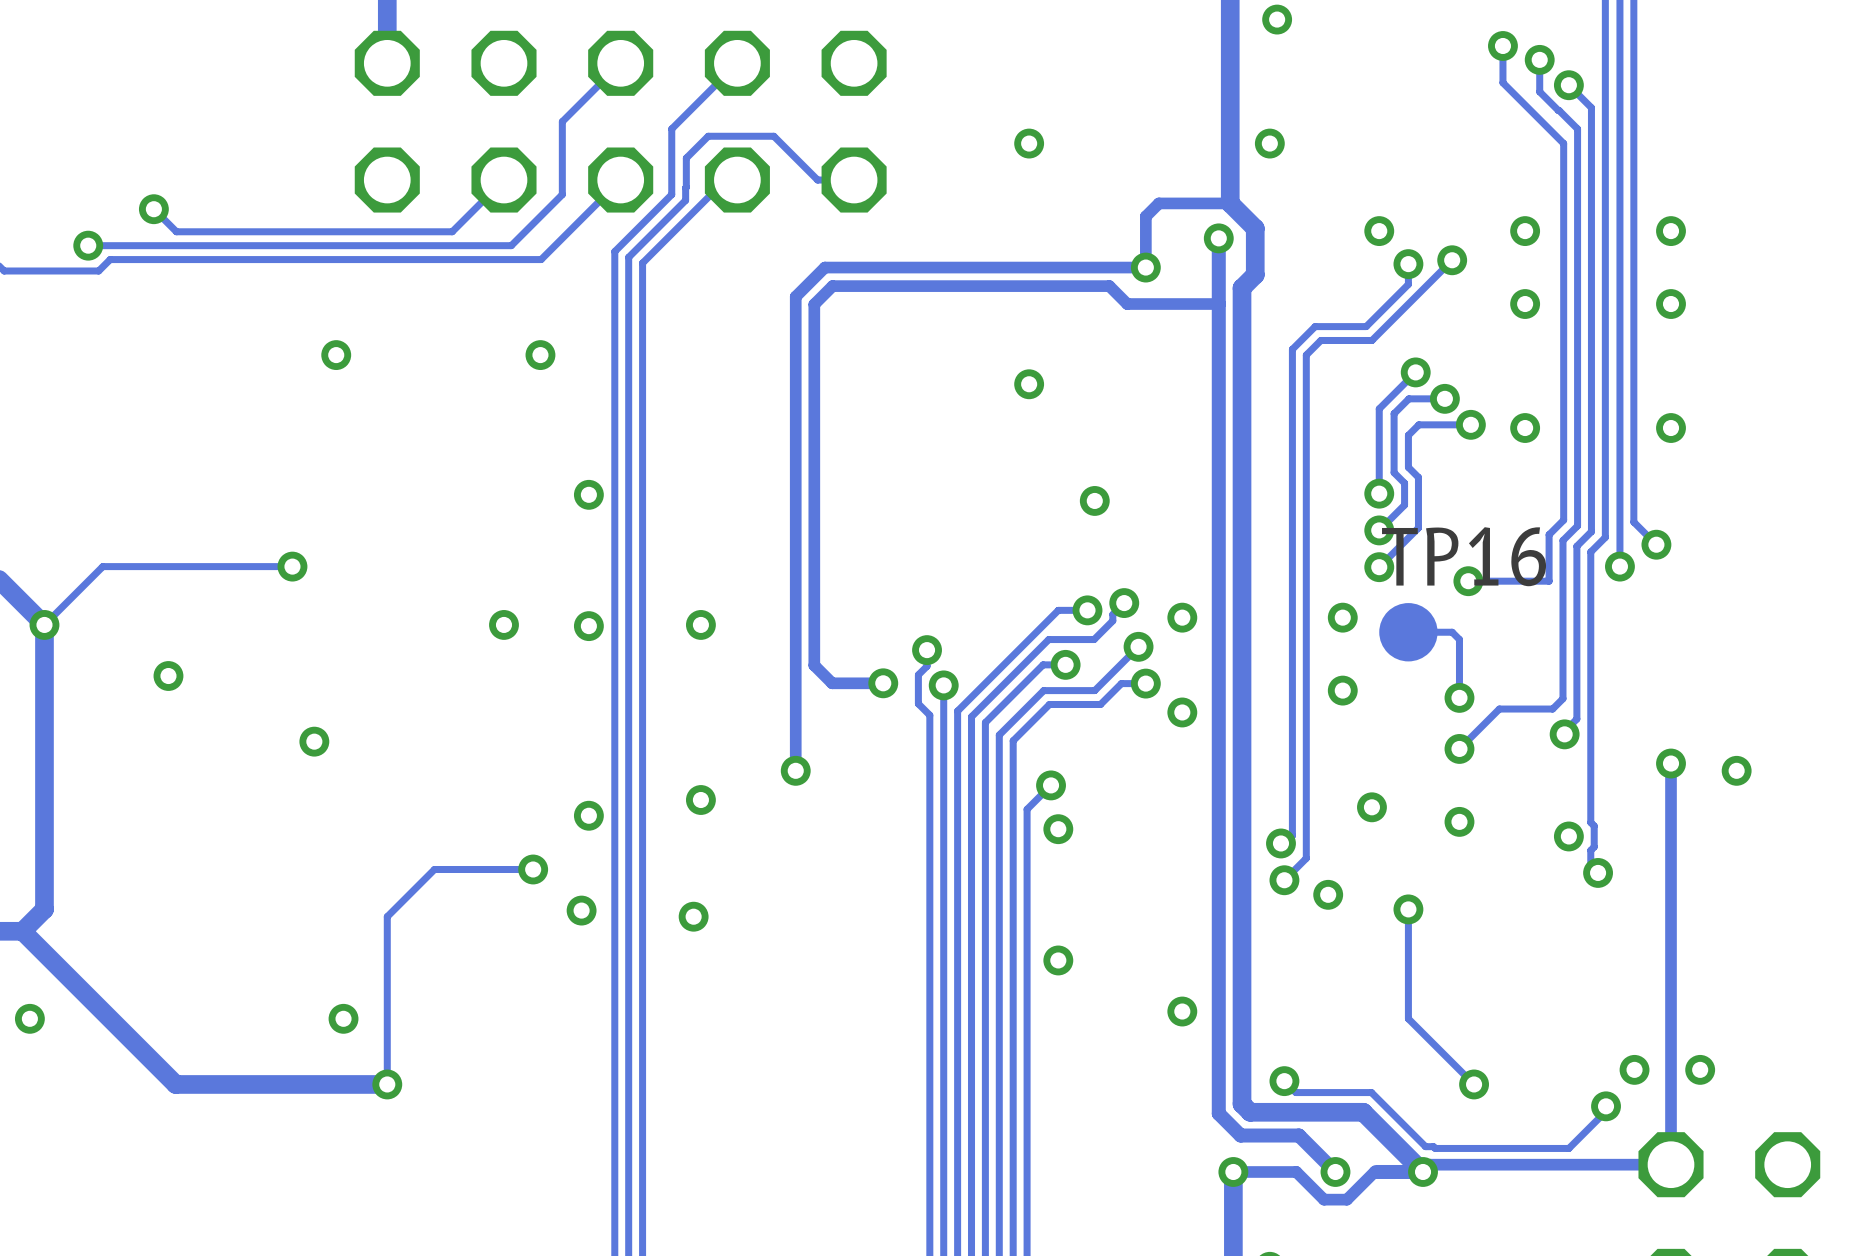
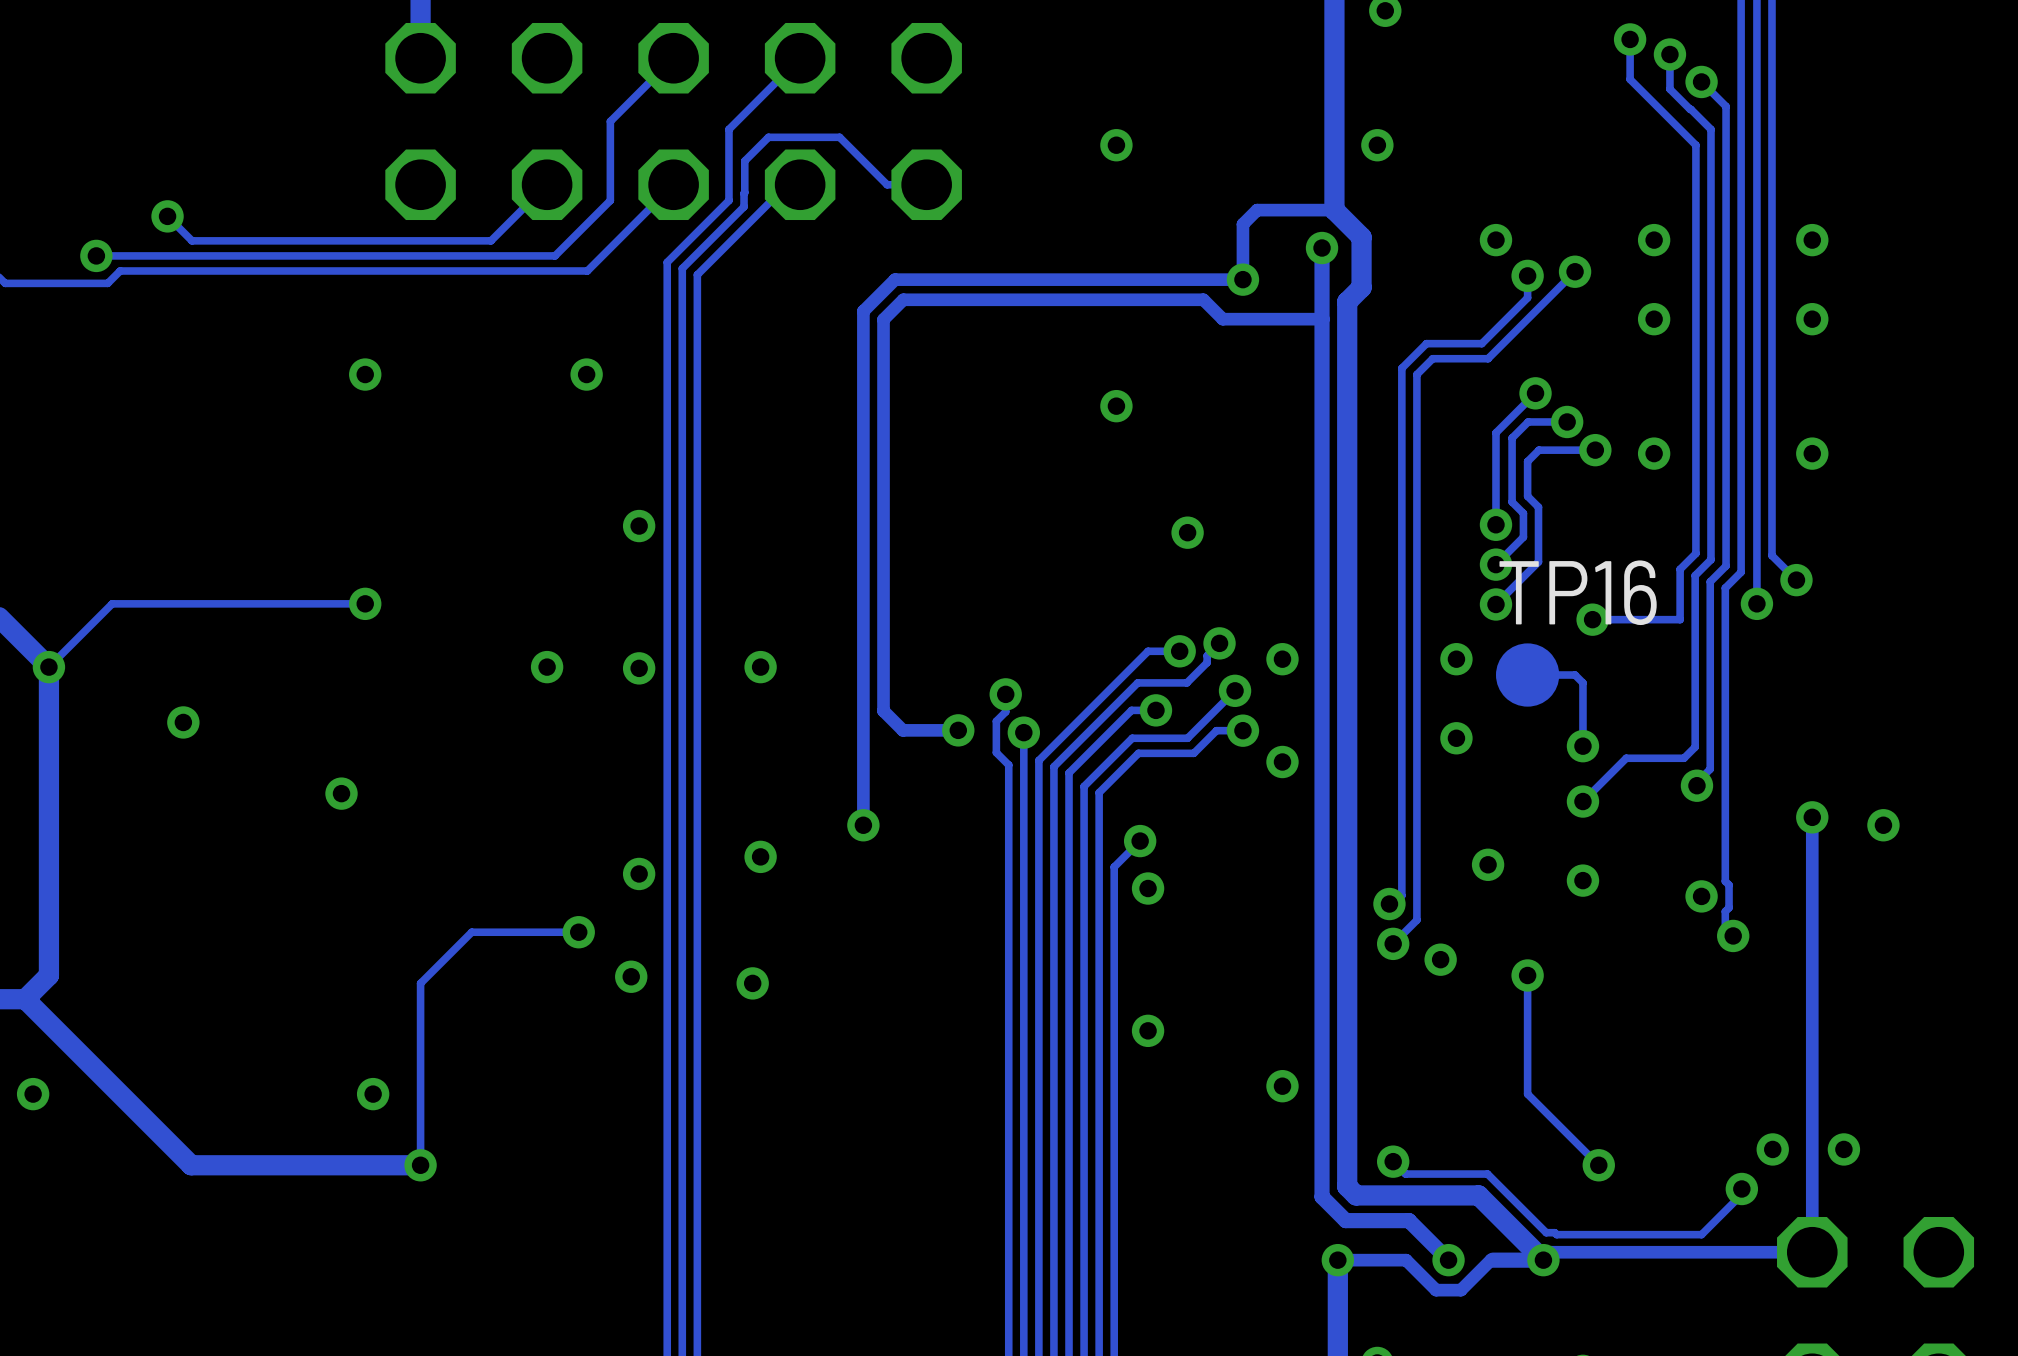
via position: (292, 566) -> (365, 603)
track: none -> (365, 603) (317, 603)

